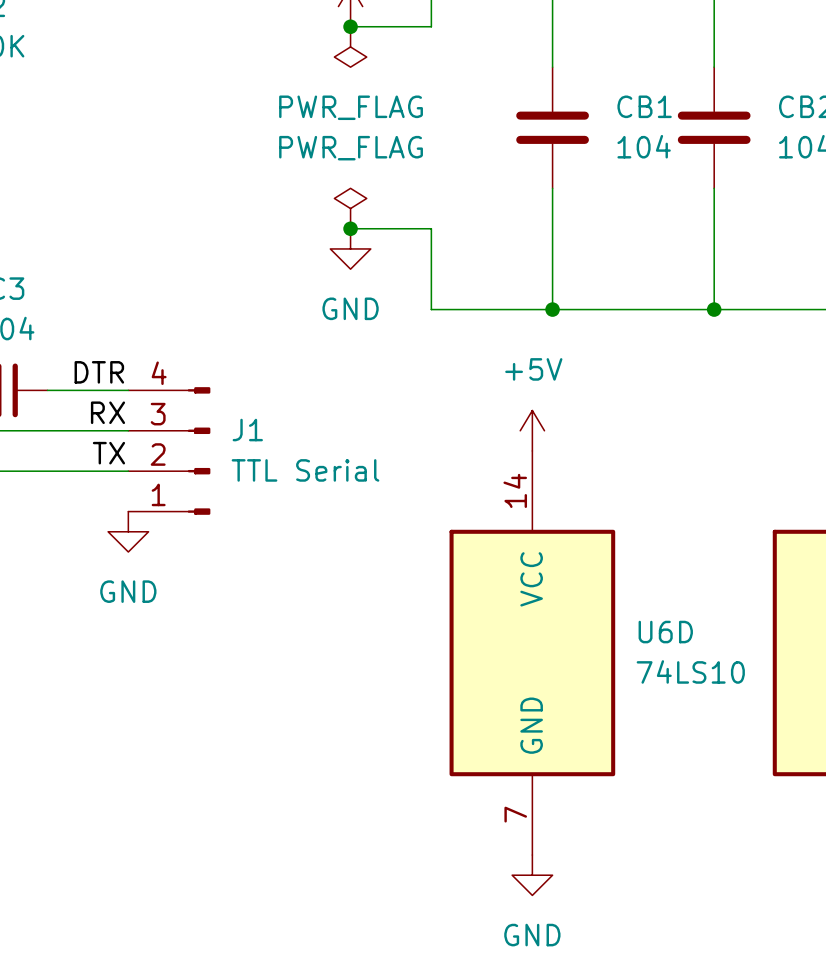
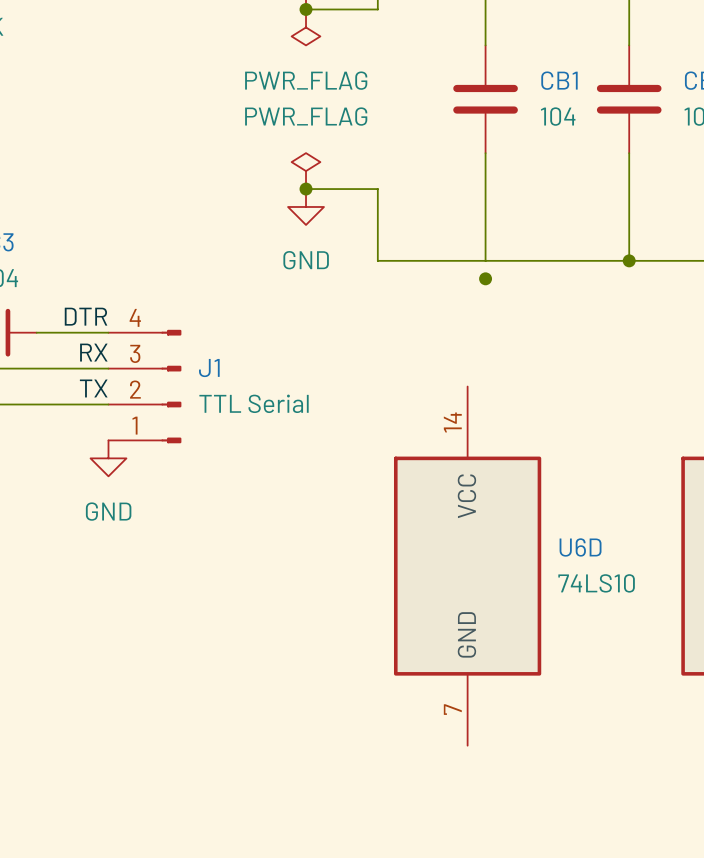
junction position: (552, 309) -> (485, 278)
power symbol: +5V (532, 430) -> none
power symbol: GND (532, 875) -> none

